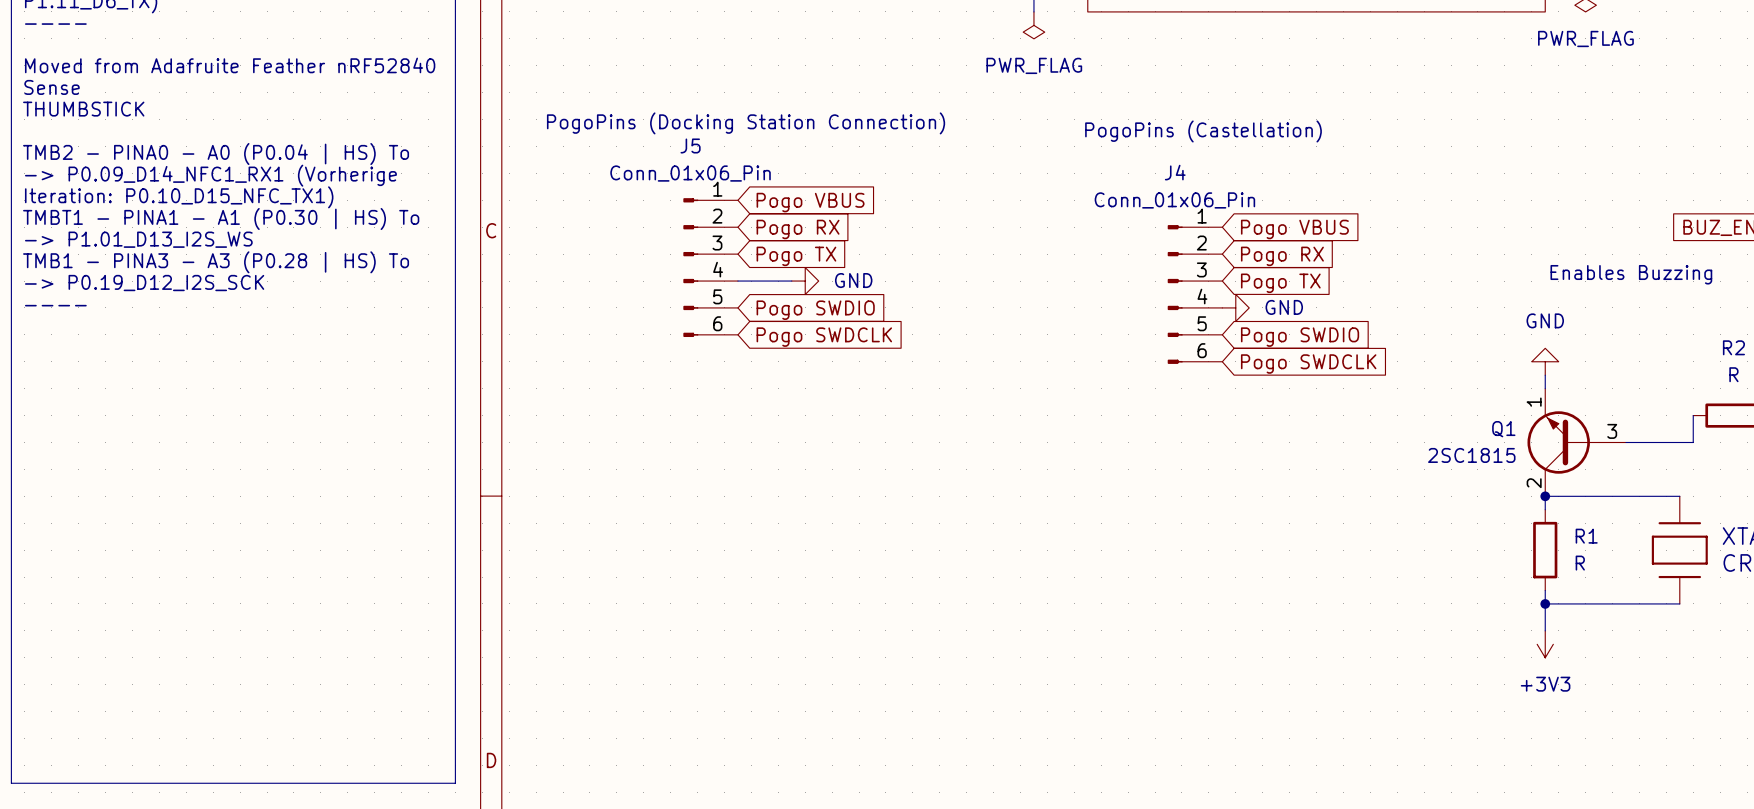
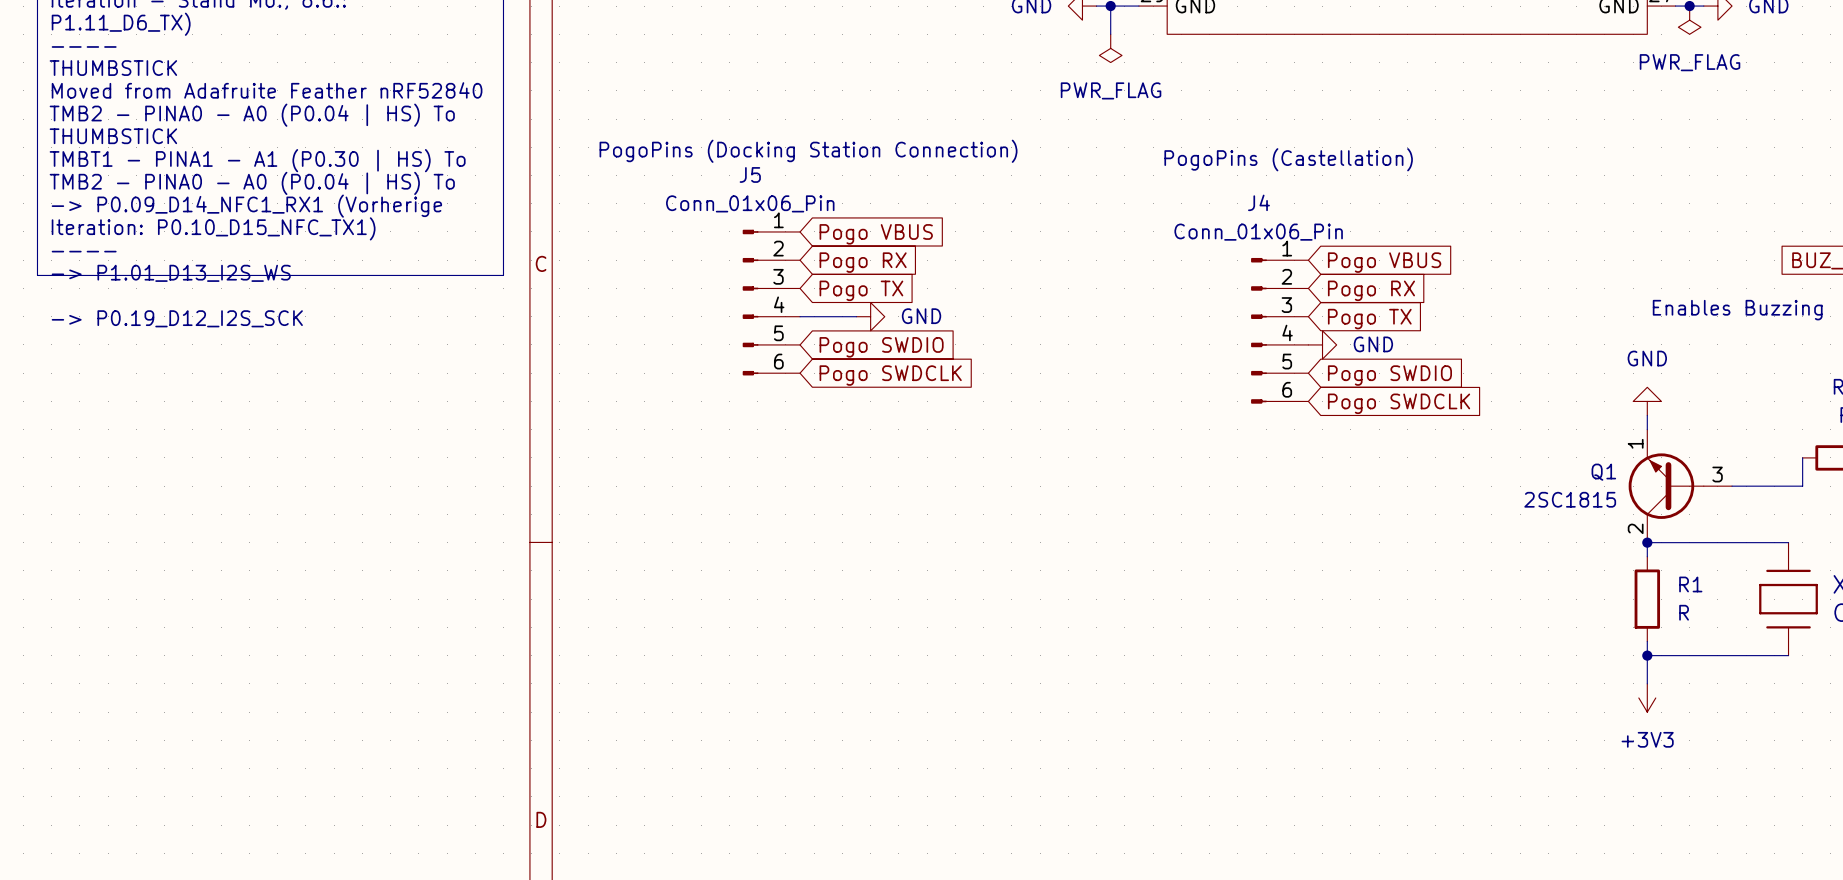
text: none -> THUMBSTICK (113, 68)
text: Sense (52, 87) -> TMB2 - PINA0 - A0 (P0.04 | HS) To (252, 115)
text: none -> TMBT1 - PINA1 - A1 (P0.30 | HS) To (257, 160)
text: TMBT1 - PINA1 - A1 (P0.30 | HS) To (221, 219) -> ---- (84, 251)
line: (11, 241) (11, 783) (455, 783) (455, 241) -> (37, 275) (503, 275)
text: TMB1 - PINA3 - A3 (P0.28 | HS) To (216, 262) -> none
text: ---- (55, 305) -> none

